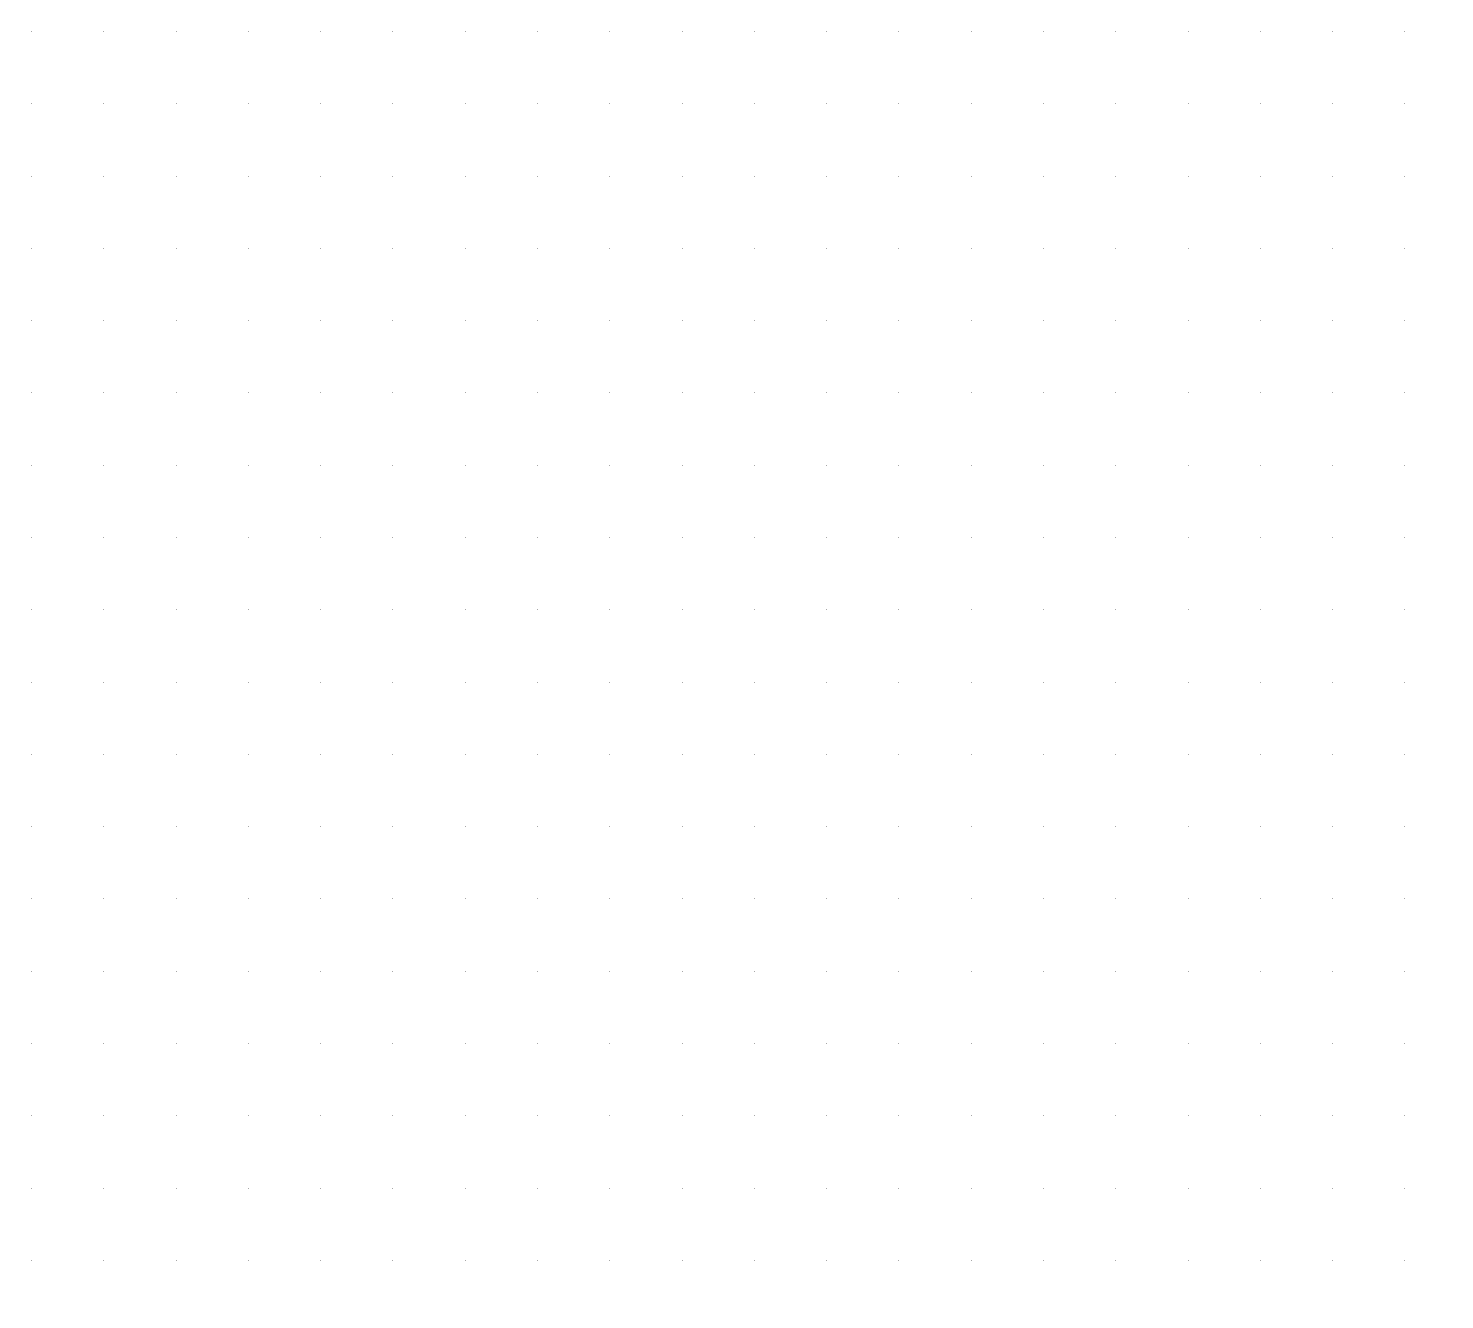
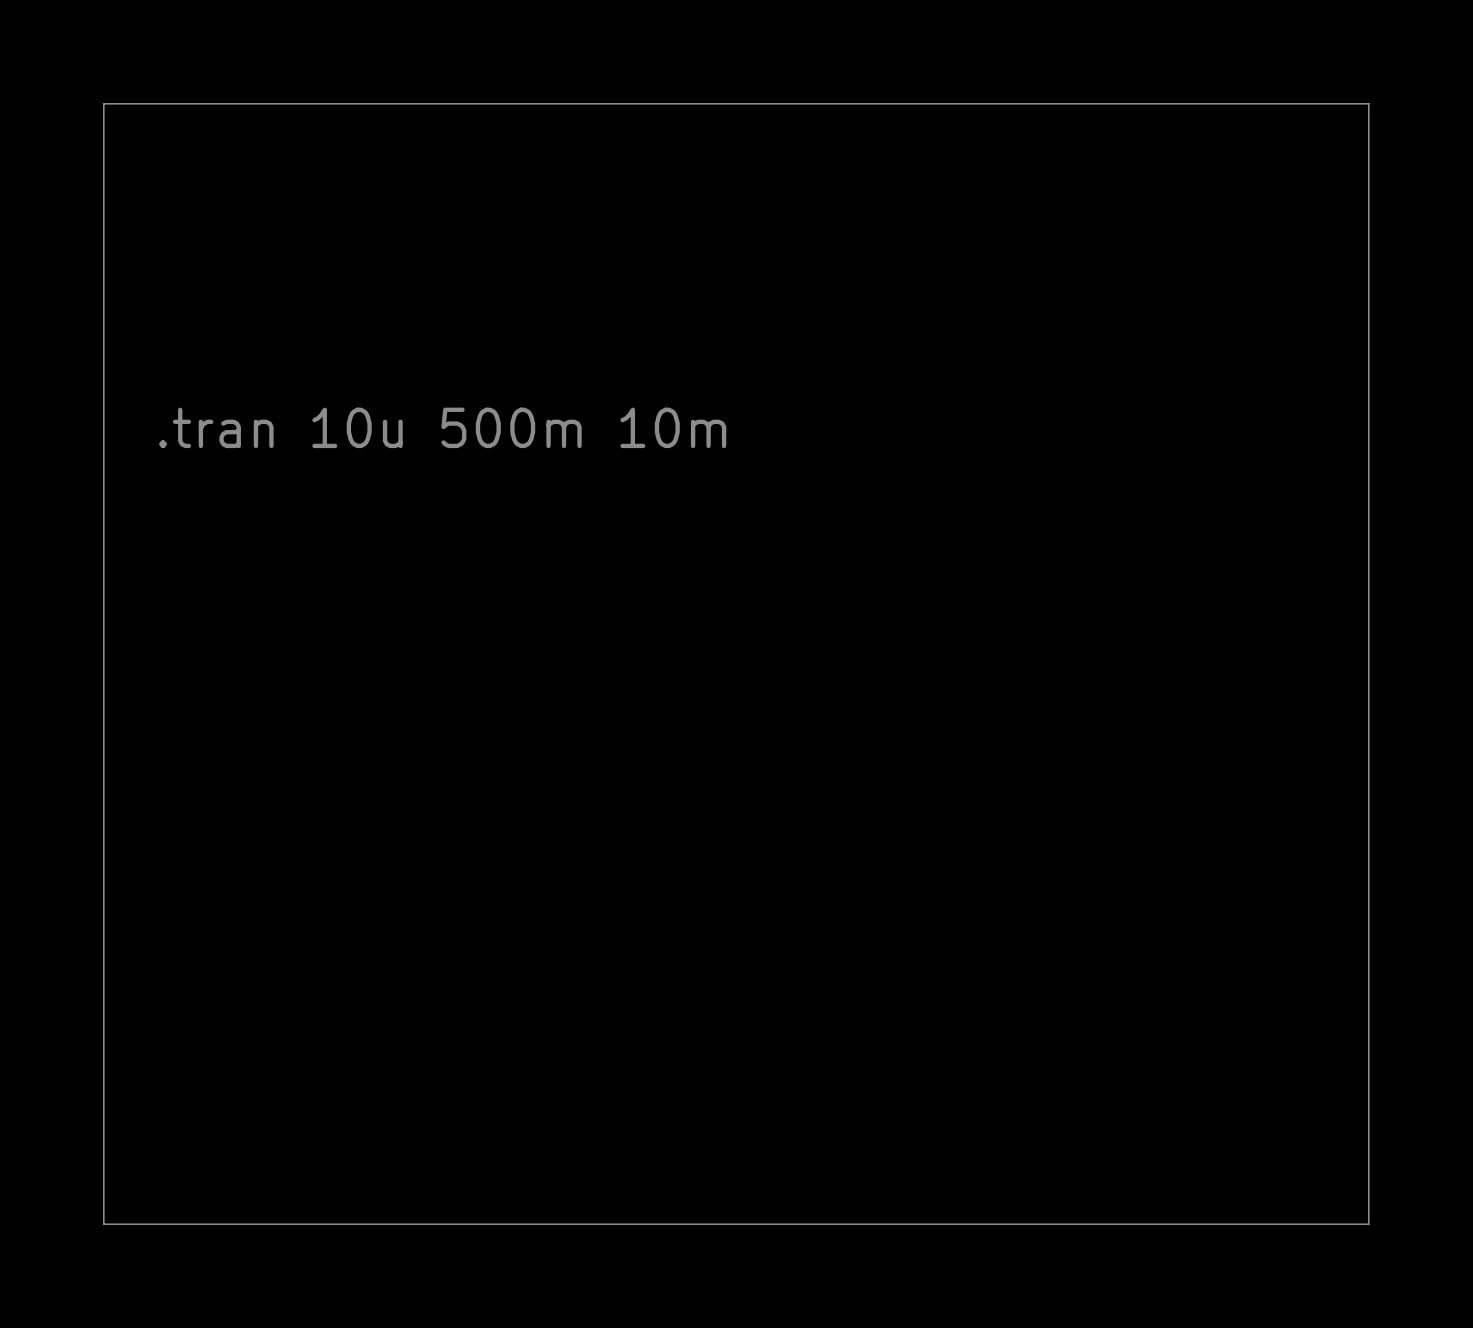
line: none -> (103, 103) (1368, 103) (1368, 1224) (103, 1224) (103, 103)
text: none -> .tran 10u 500m 10m (442, 427)

